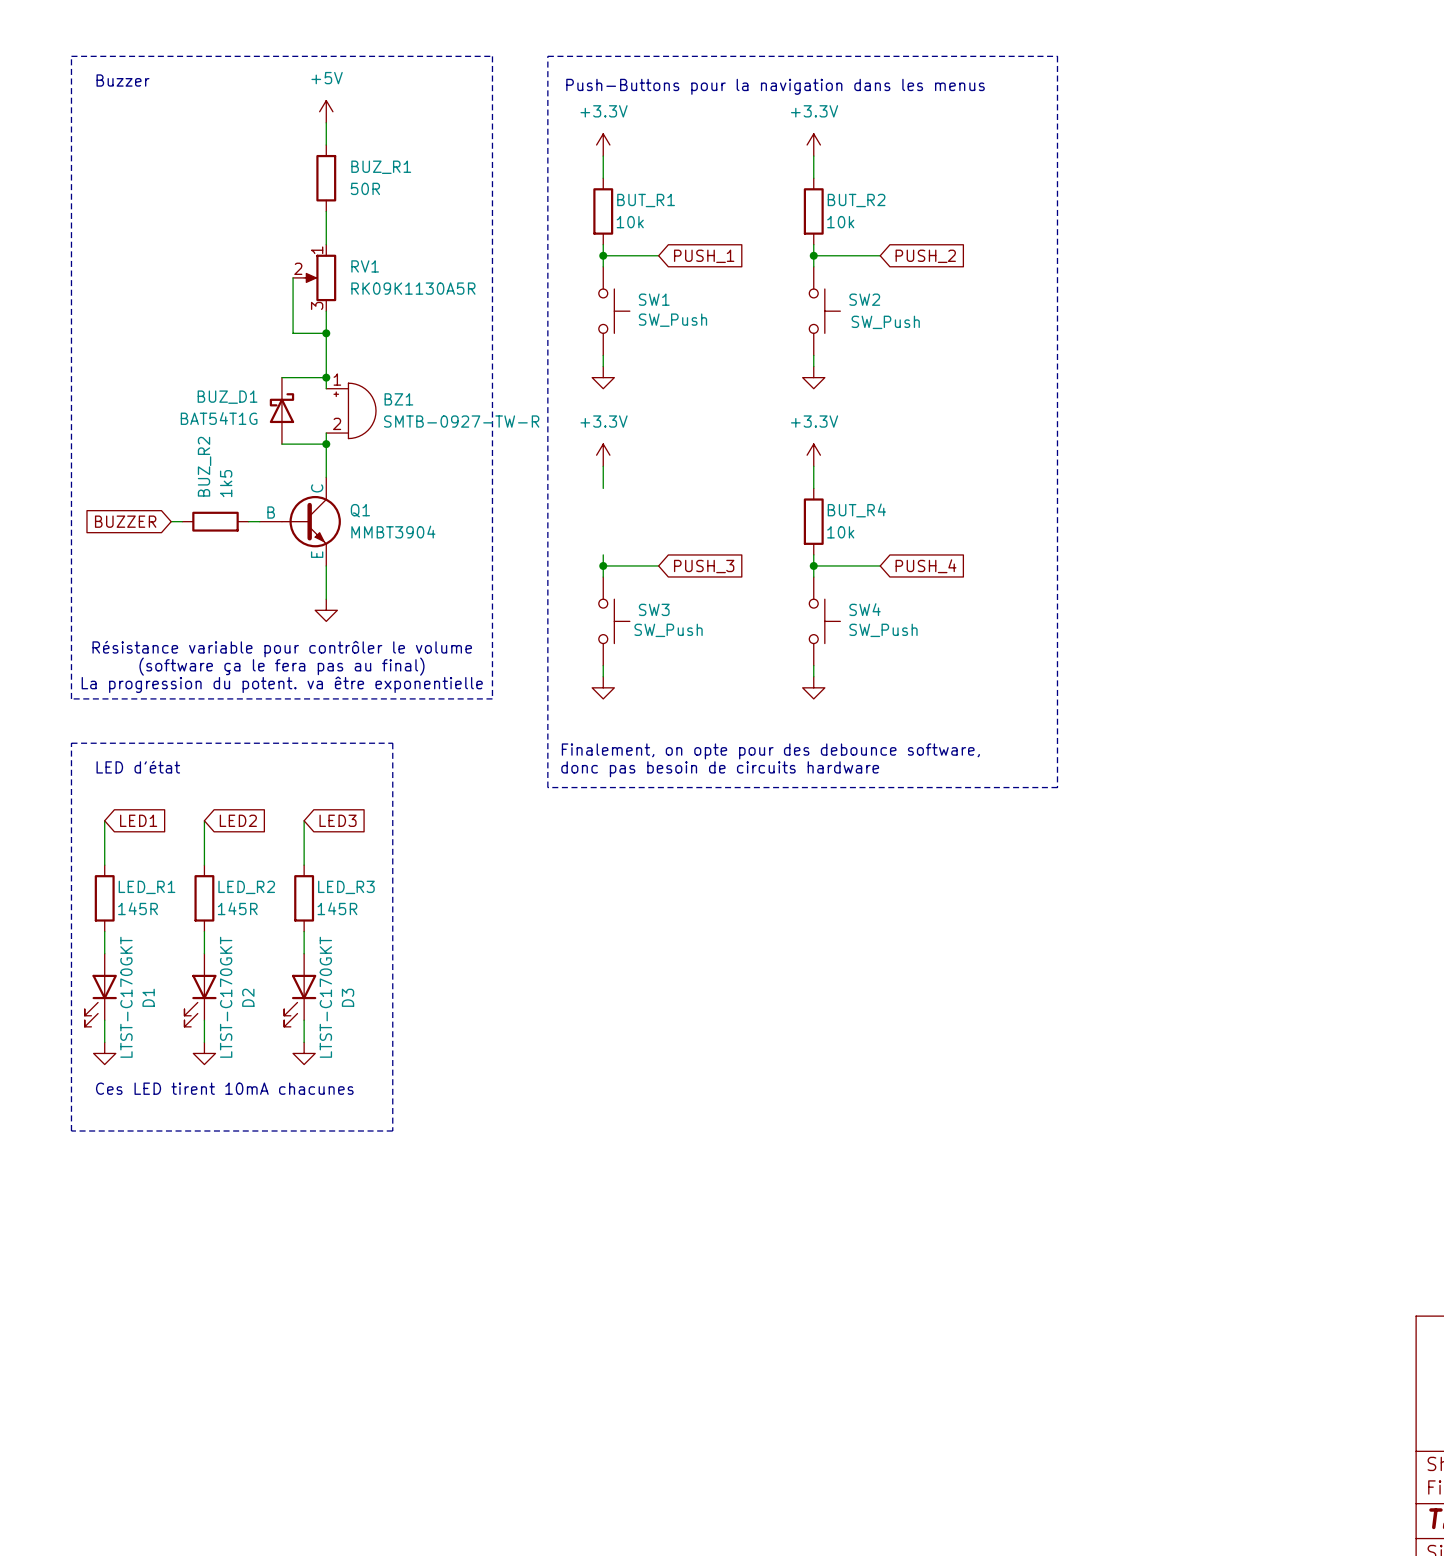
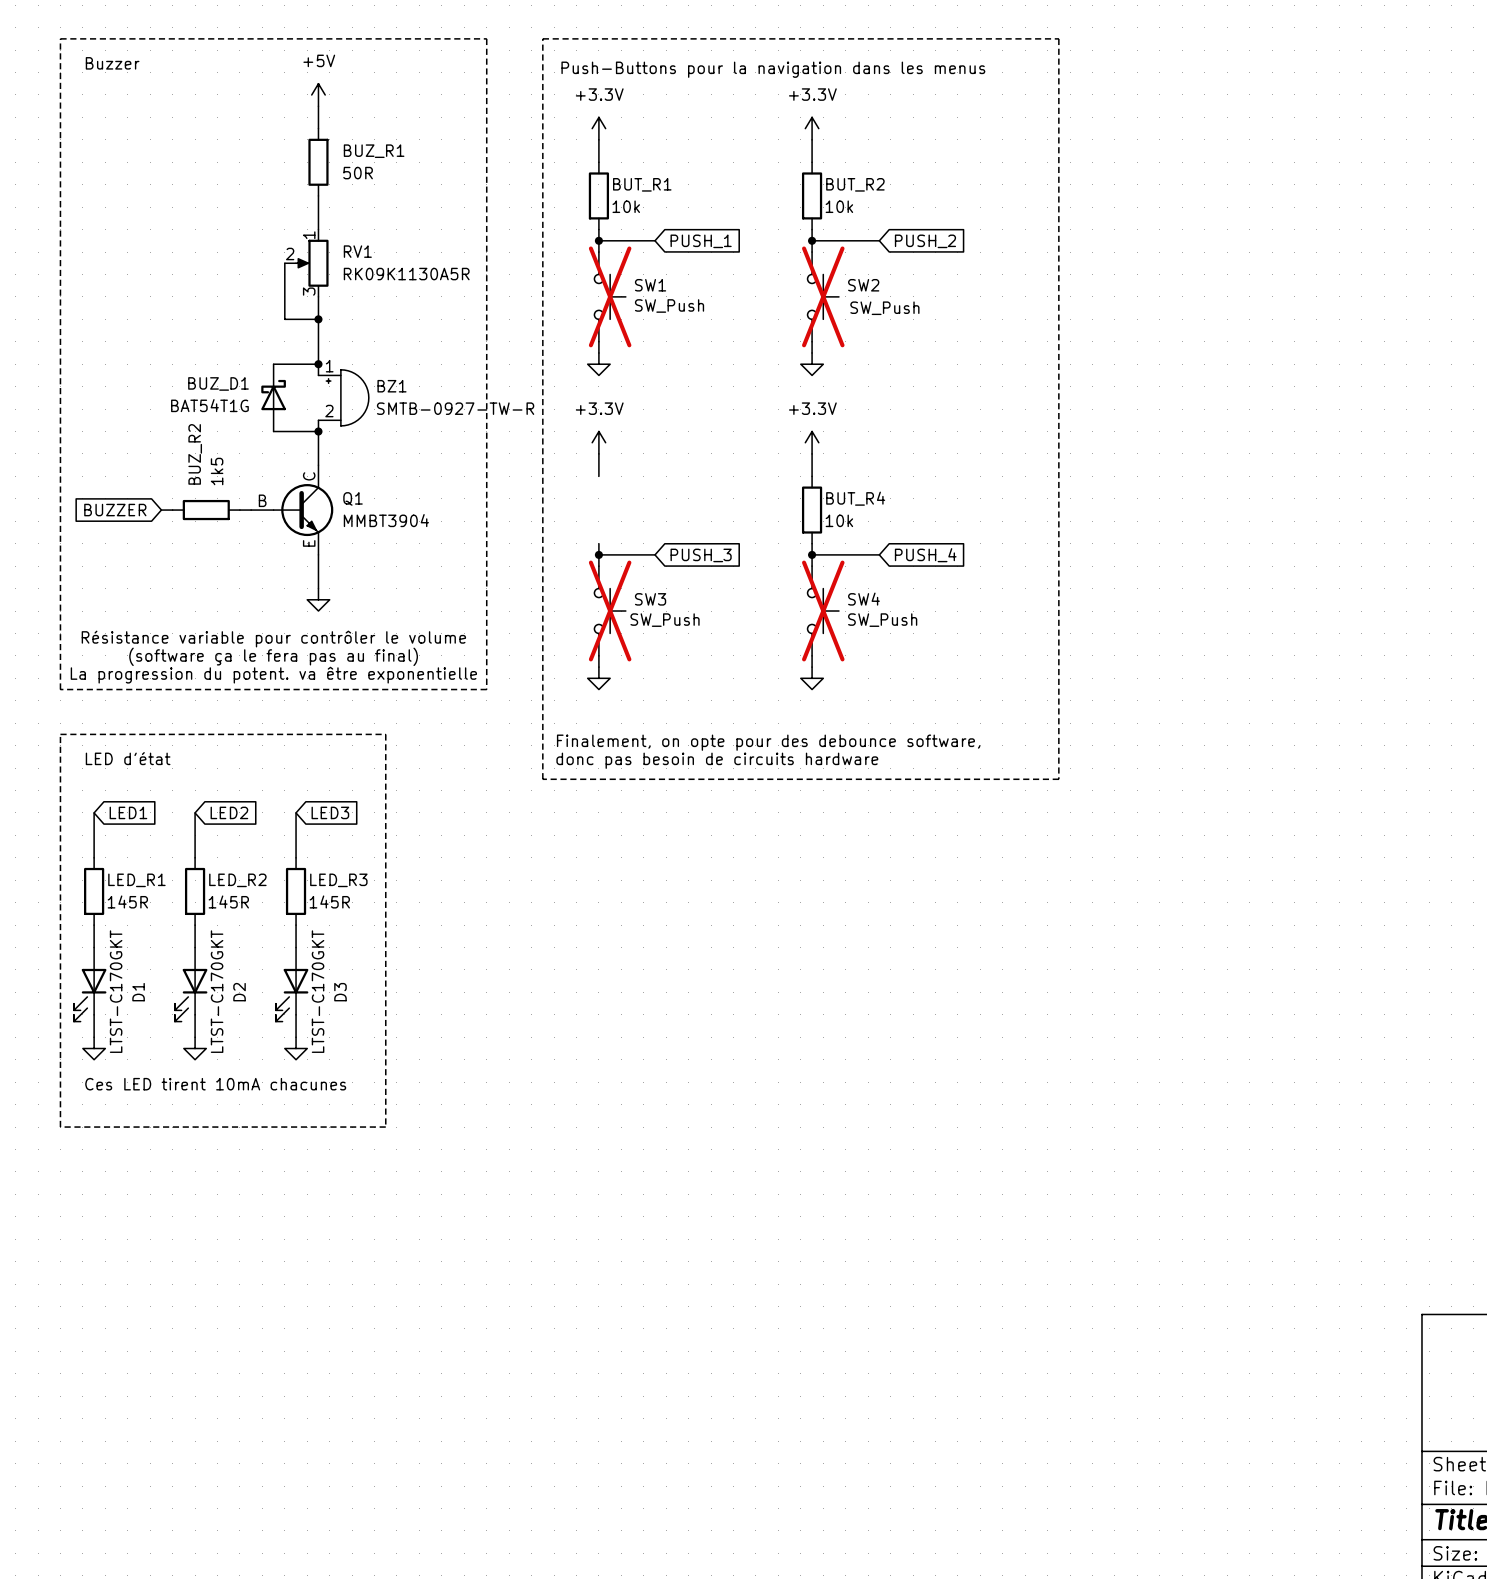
SW1 do-not-place cross: none -> (610, 296)
SW2 do-not-place cross: none -> (823, 296)
SW3 do-not-place cross: none -> (610, 611)
SW4 do-not-place cross: none -> (823, 611)

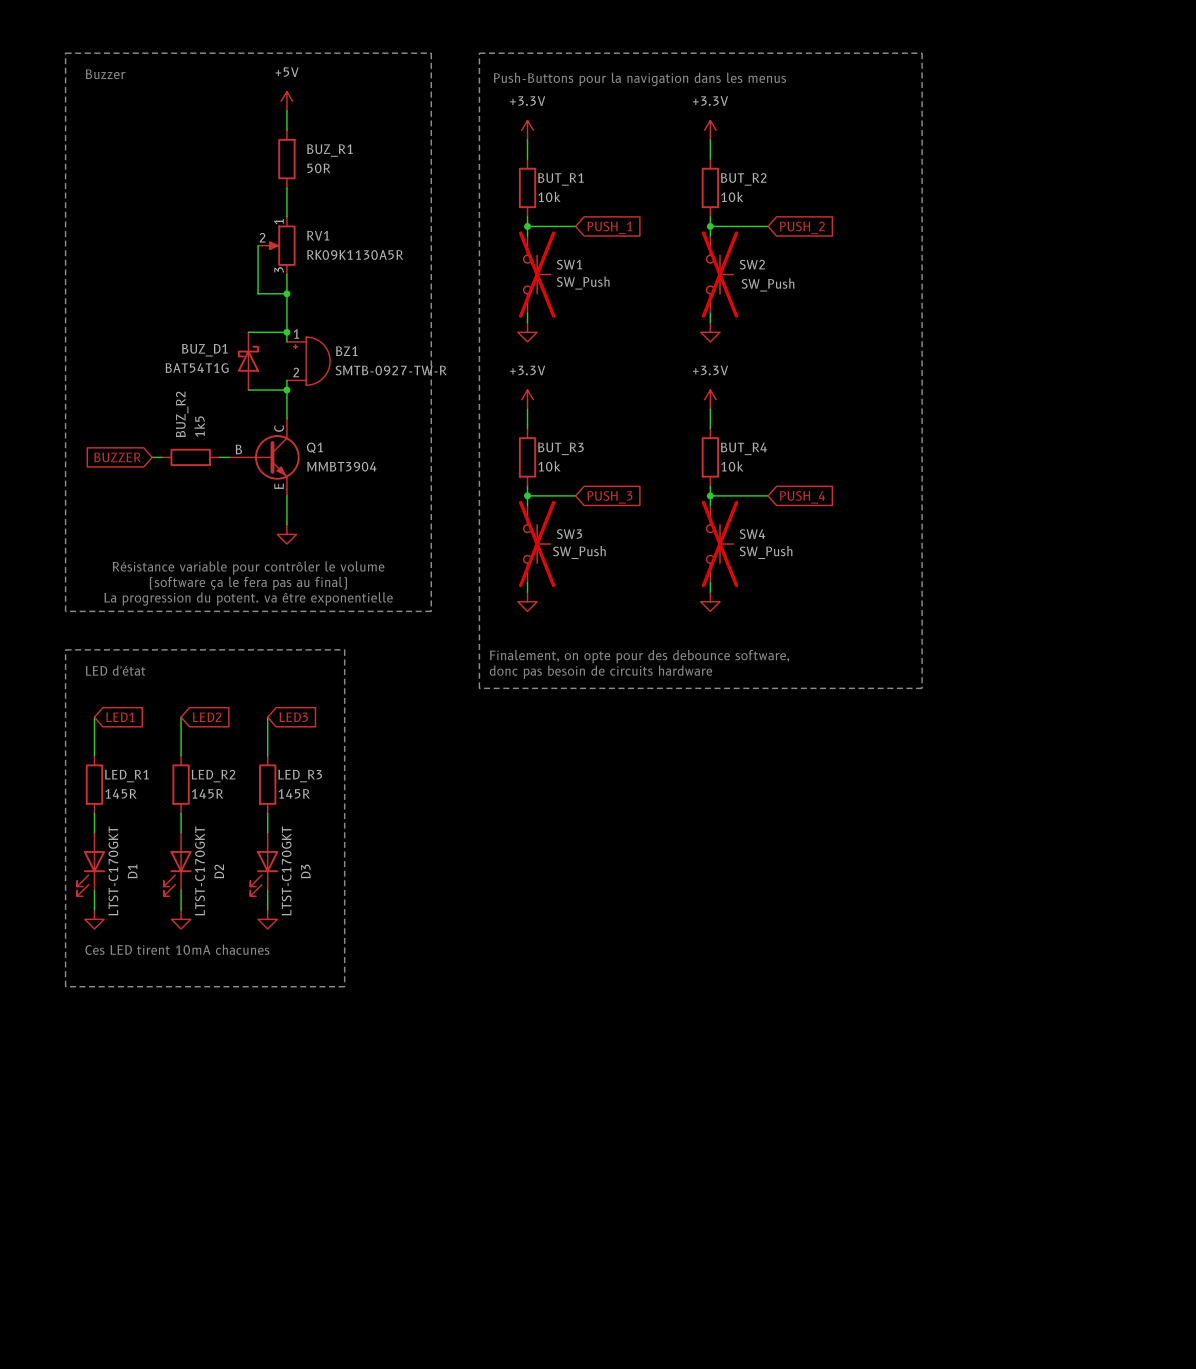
BUT_R3: none -> 10k (527, 457)

